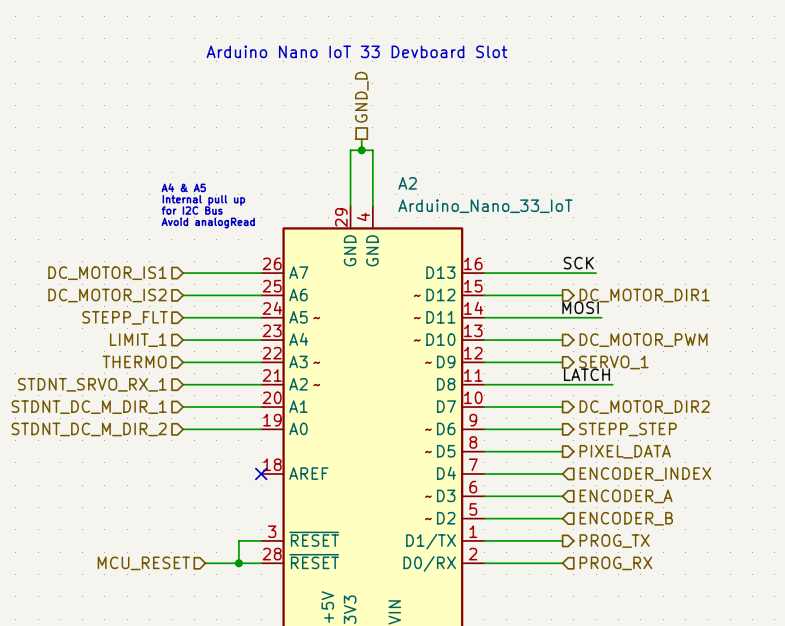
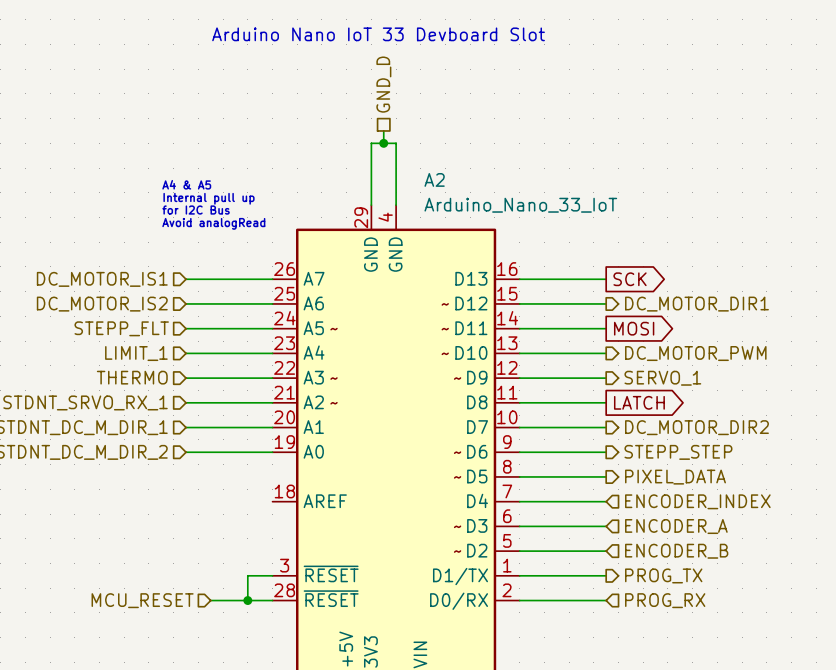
label: SCK (578, 263) -> none
wire: (562, 273) (596, 273) -> none
global label: none -> SCK (630, 279)
label: MOSI (580, 307) -> none
wire: (562, 317) (601, 317) -> none
global label: none -> MOSI (634, 328)
label: LATCH (586, 374) -> none
wire: (562, 384) (612, 384) -> none
global label: none -> LATCH (639, 402)
no-connect mark: (261, 473) -> none

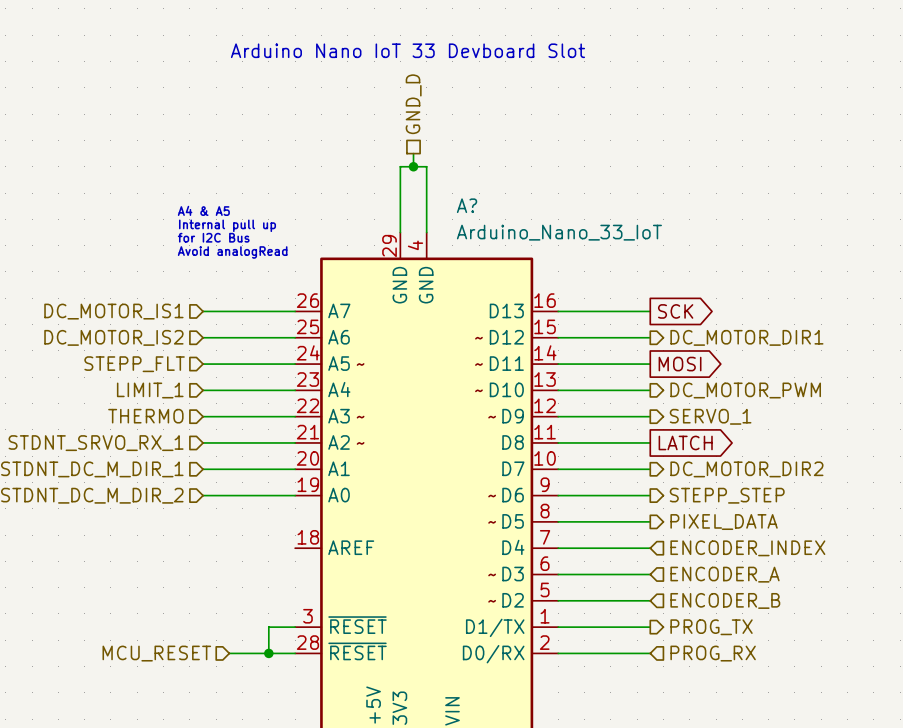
A2 name: A2 (434, 179) -> A? (467, 205)

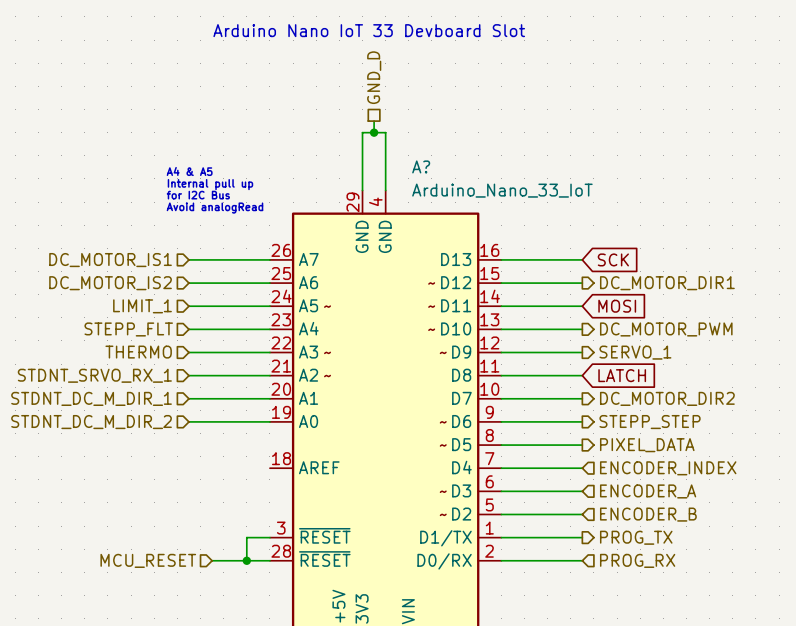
global label shape: output (675, 311) -> input (613, 259)
hierarchical label: STEPP_FLT (134, 364) -> LIMIT_1 (142, 306)
global label shape: output (680, 364) -> input (617, 306)
hierarchical label: LIMIT_1 (150, 390) -> STEPP_FLT (128, 329)
global label shape: output (685, 442) -> input (622, 375)

